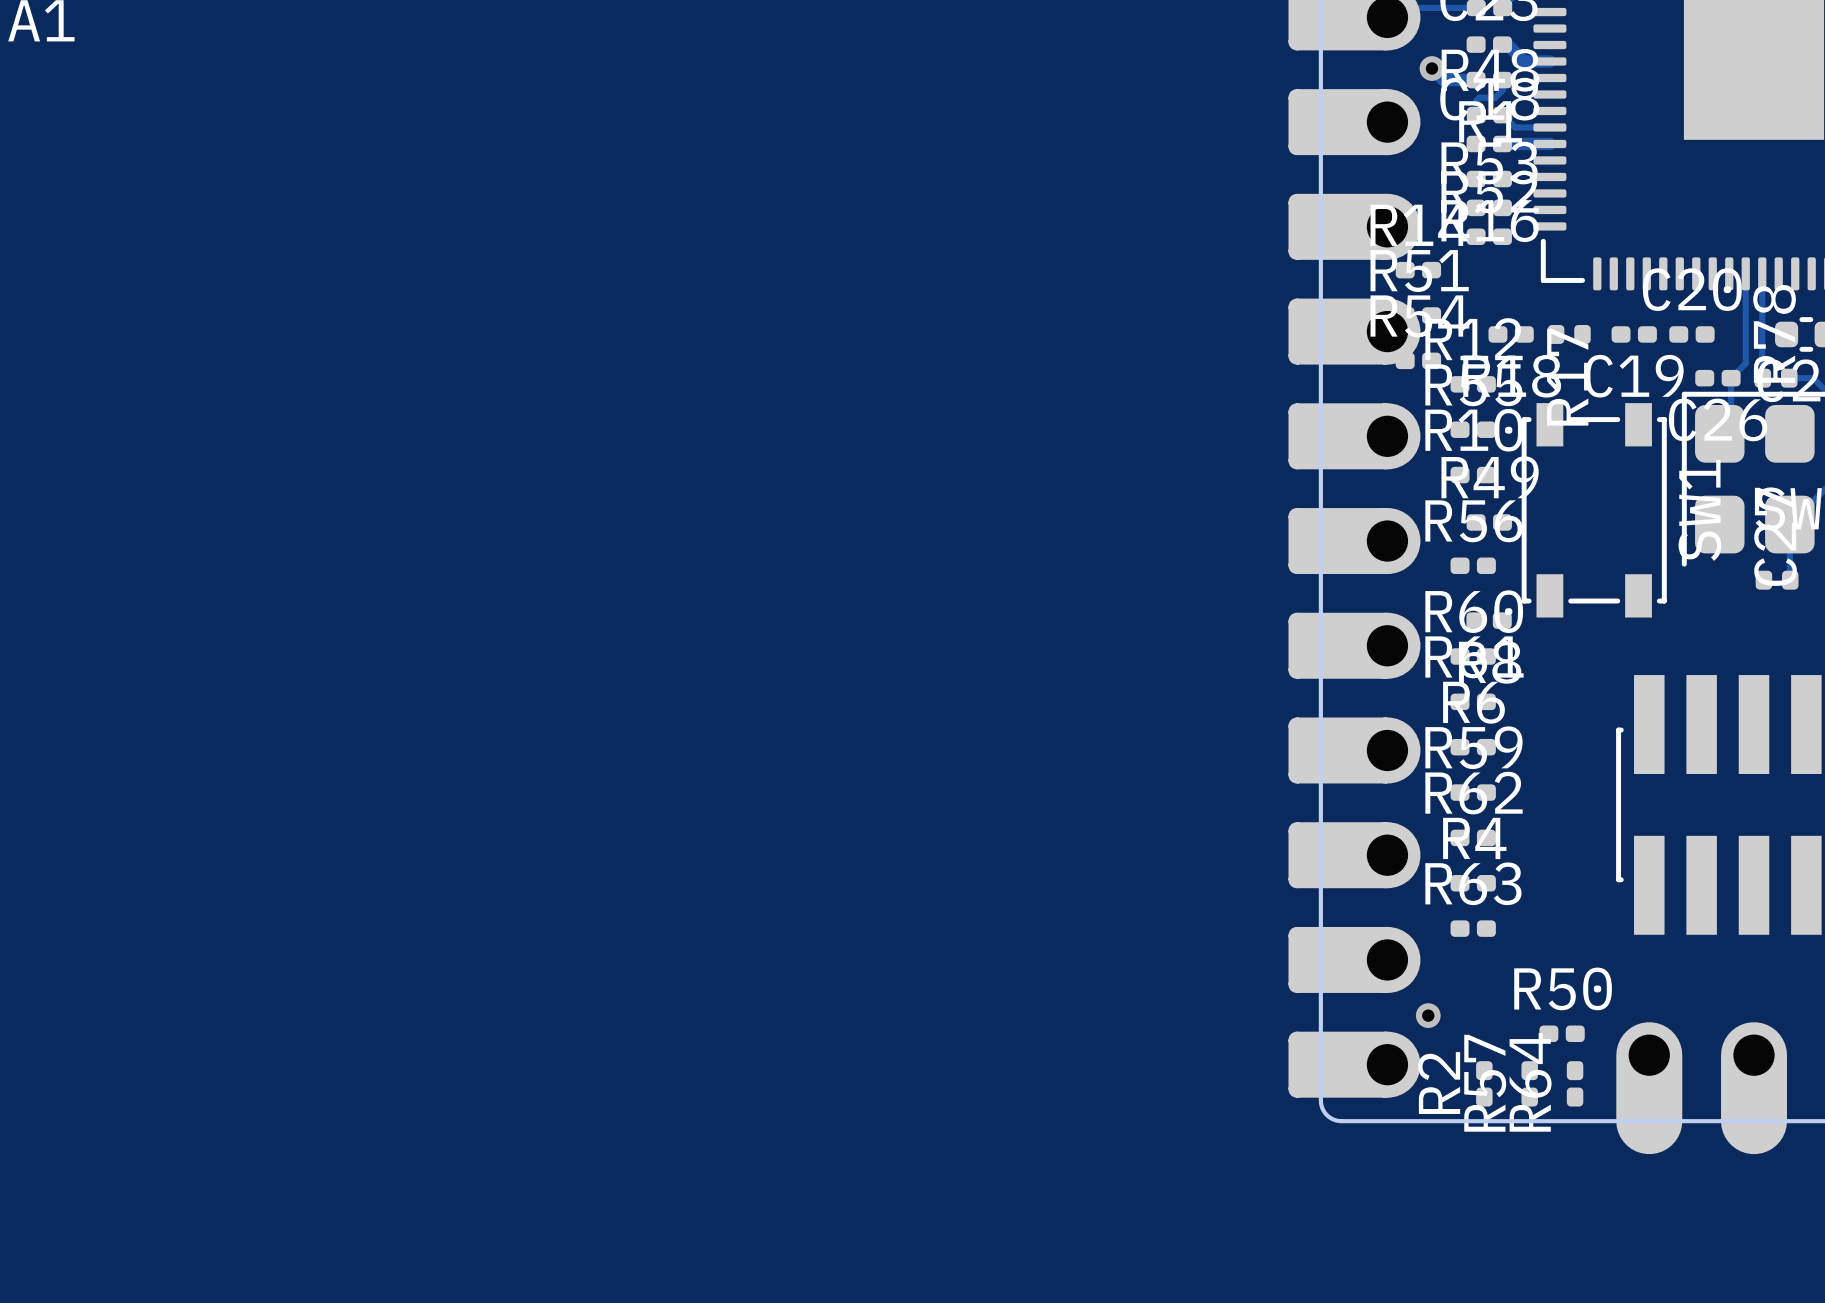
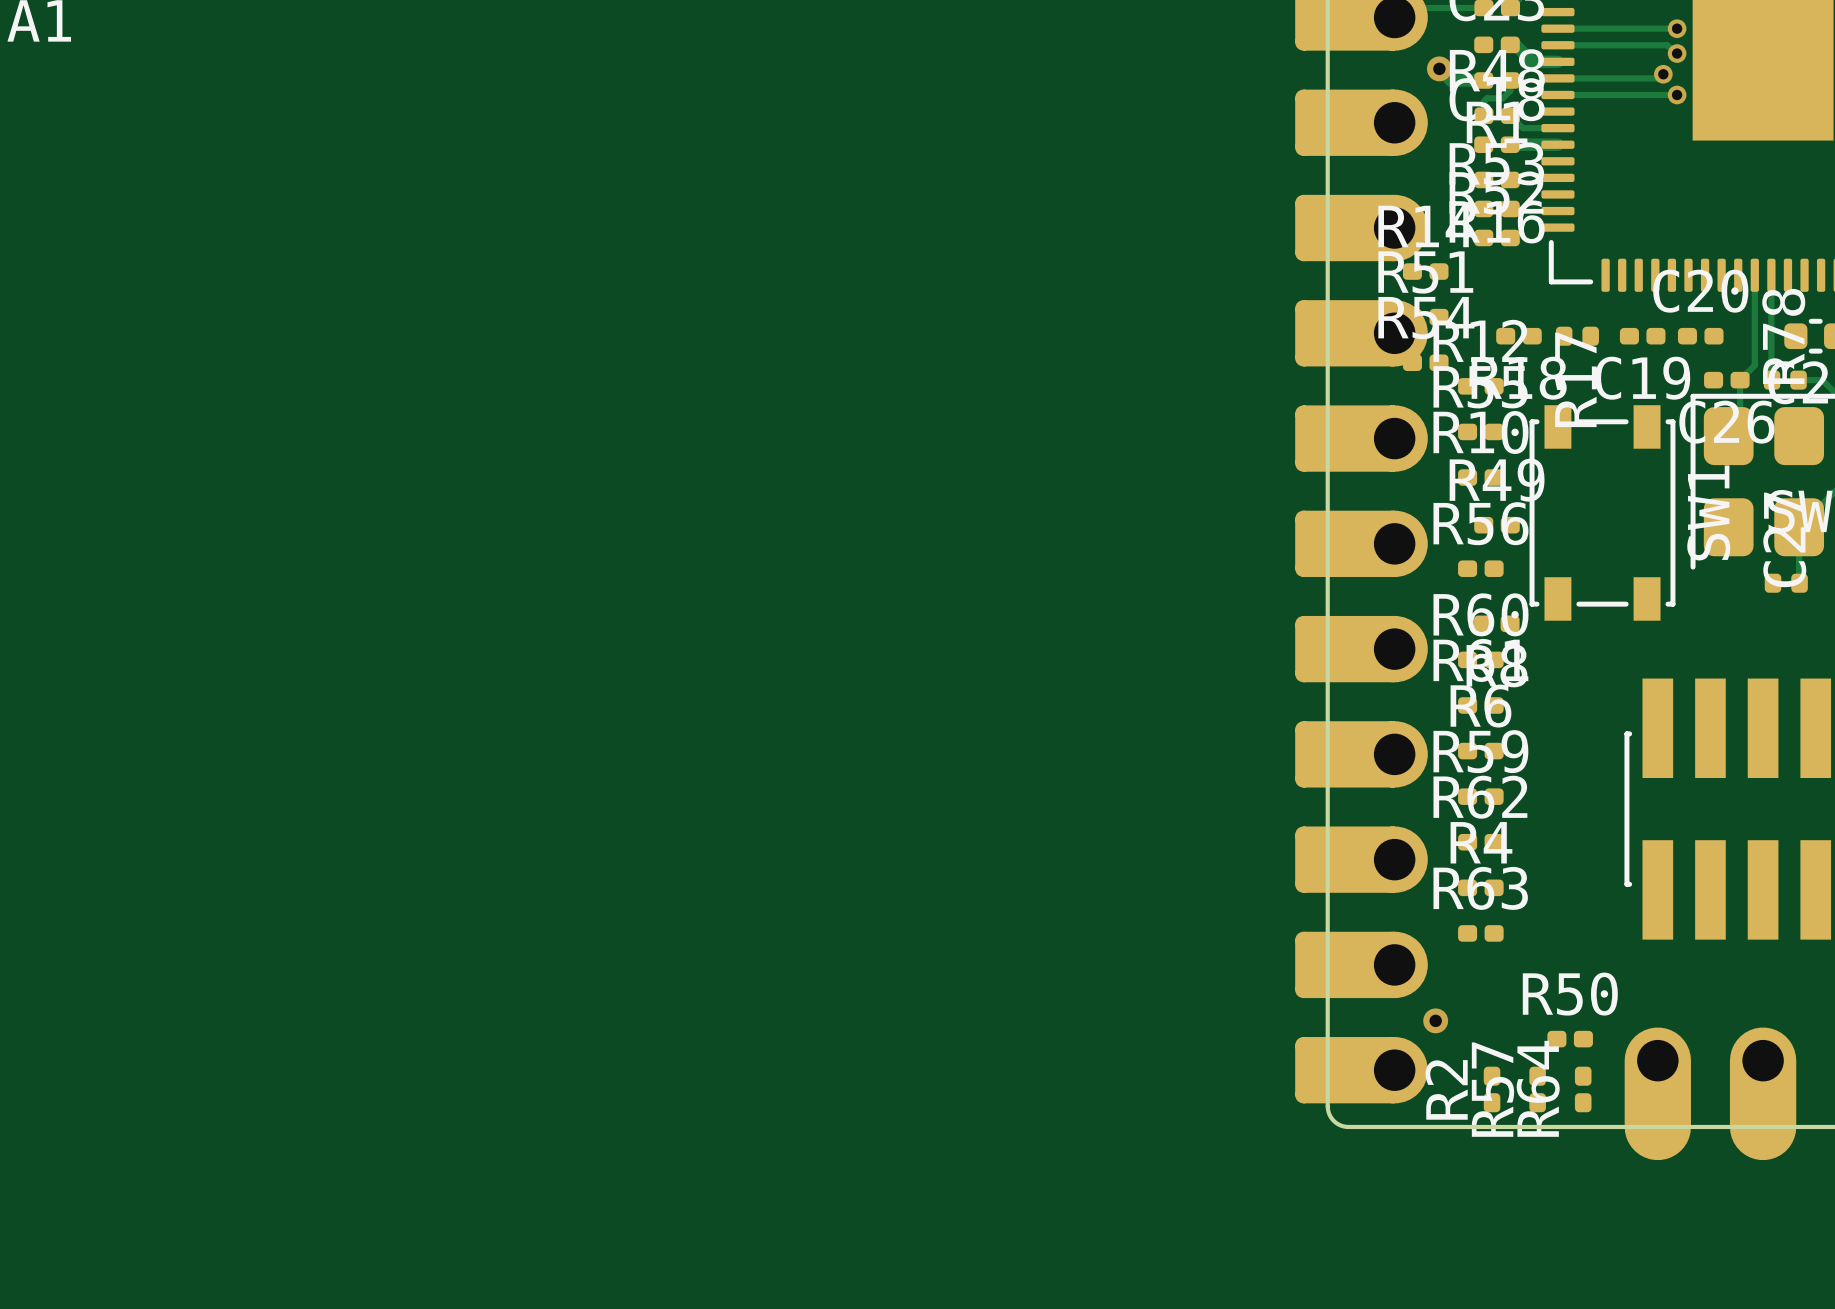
track: none -> (1557, 28) (1677, 28)
via: none -> (1677, 28)
track: none -> (1557, 45) (1667, 45) (1677, 53)
via: none -> (1677, 53)
track: none -> (1663, 74) (1659, 78) (1557, 78)
via: none -> (1663, 74)
track: none -> (1557, 94) (1677, 94)
via: none -> (1677, 94)

